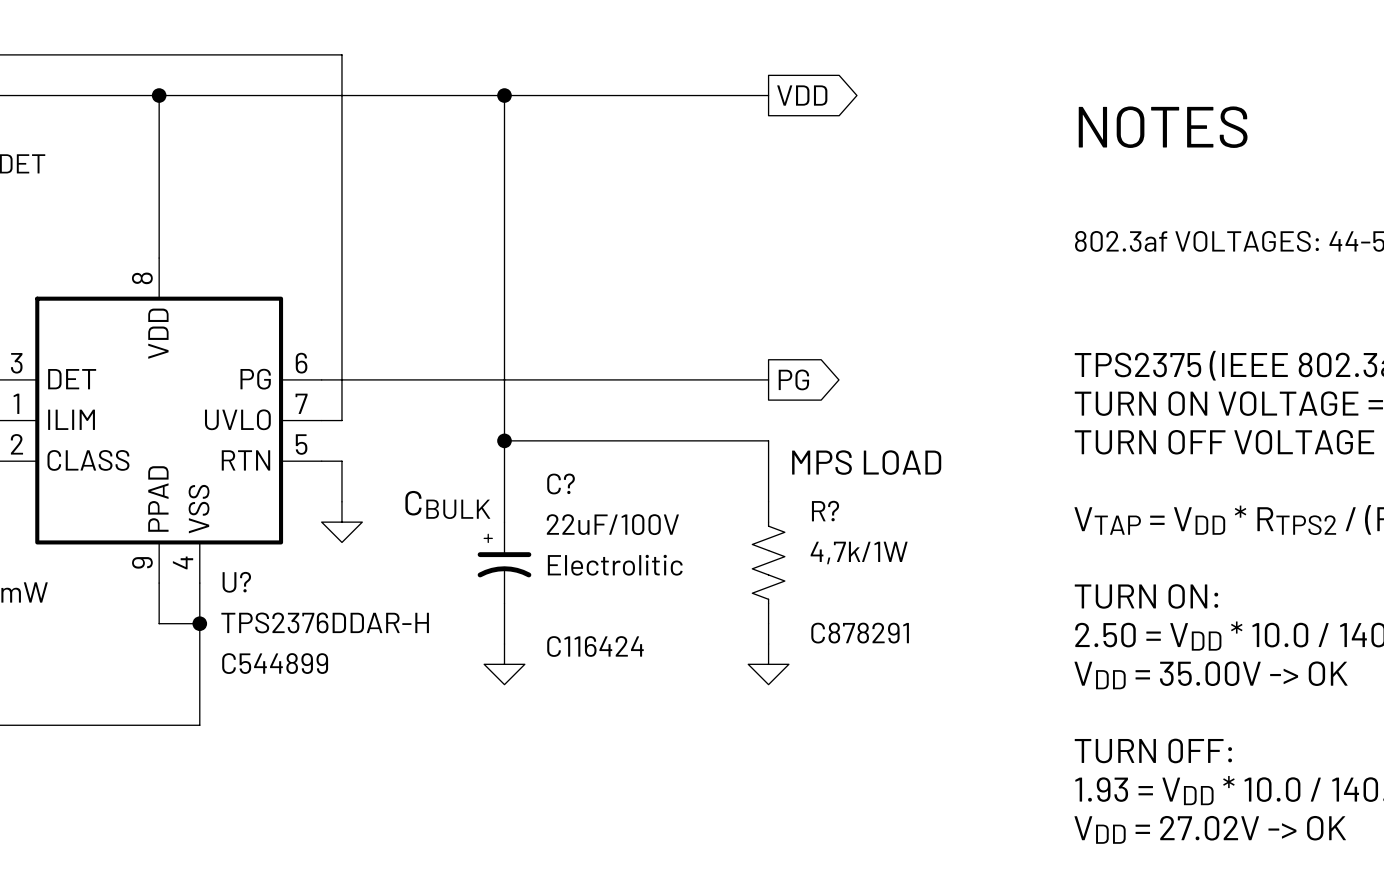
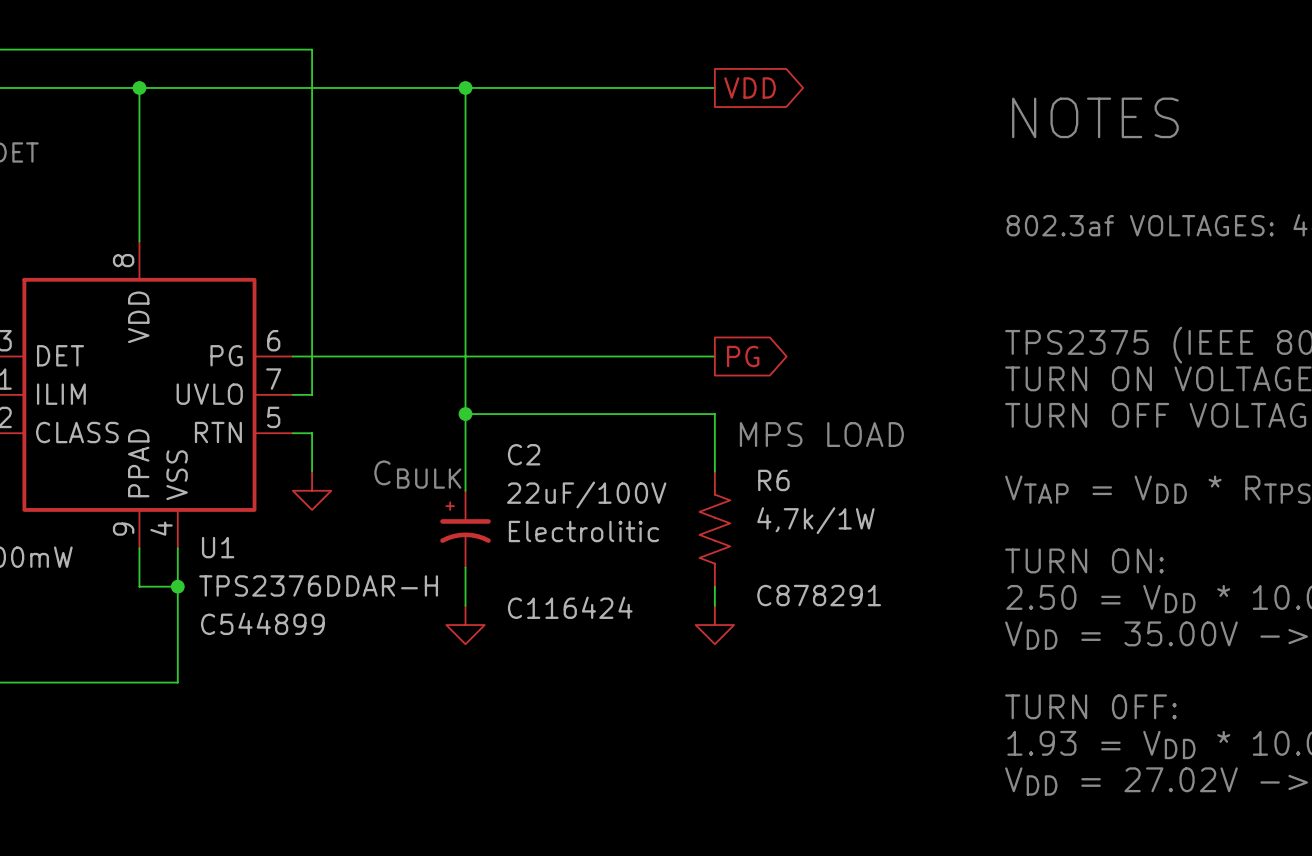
C? name: C? (561, 483) -> C2 (524, 454)
R? name: R? (825, 511) -> R6 (773, 480)
U? name: U? (236, 582) -> U1 (218, 547)

